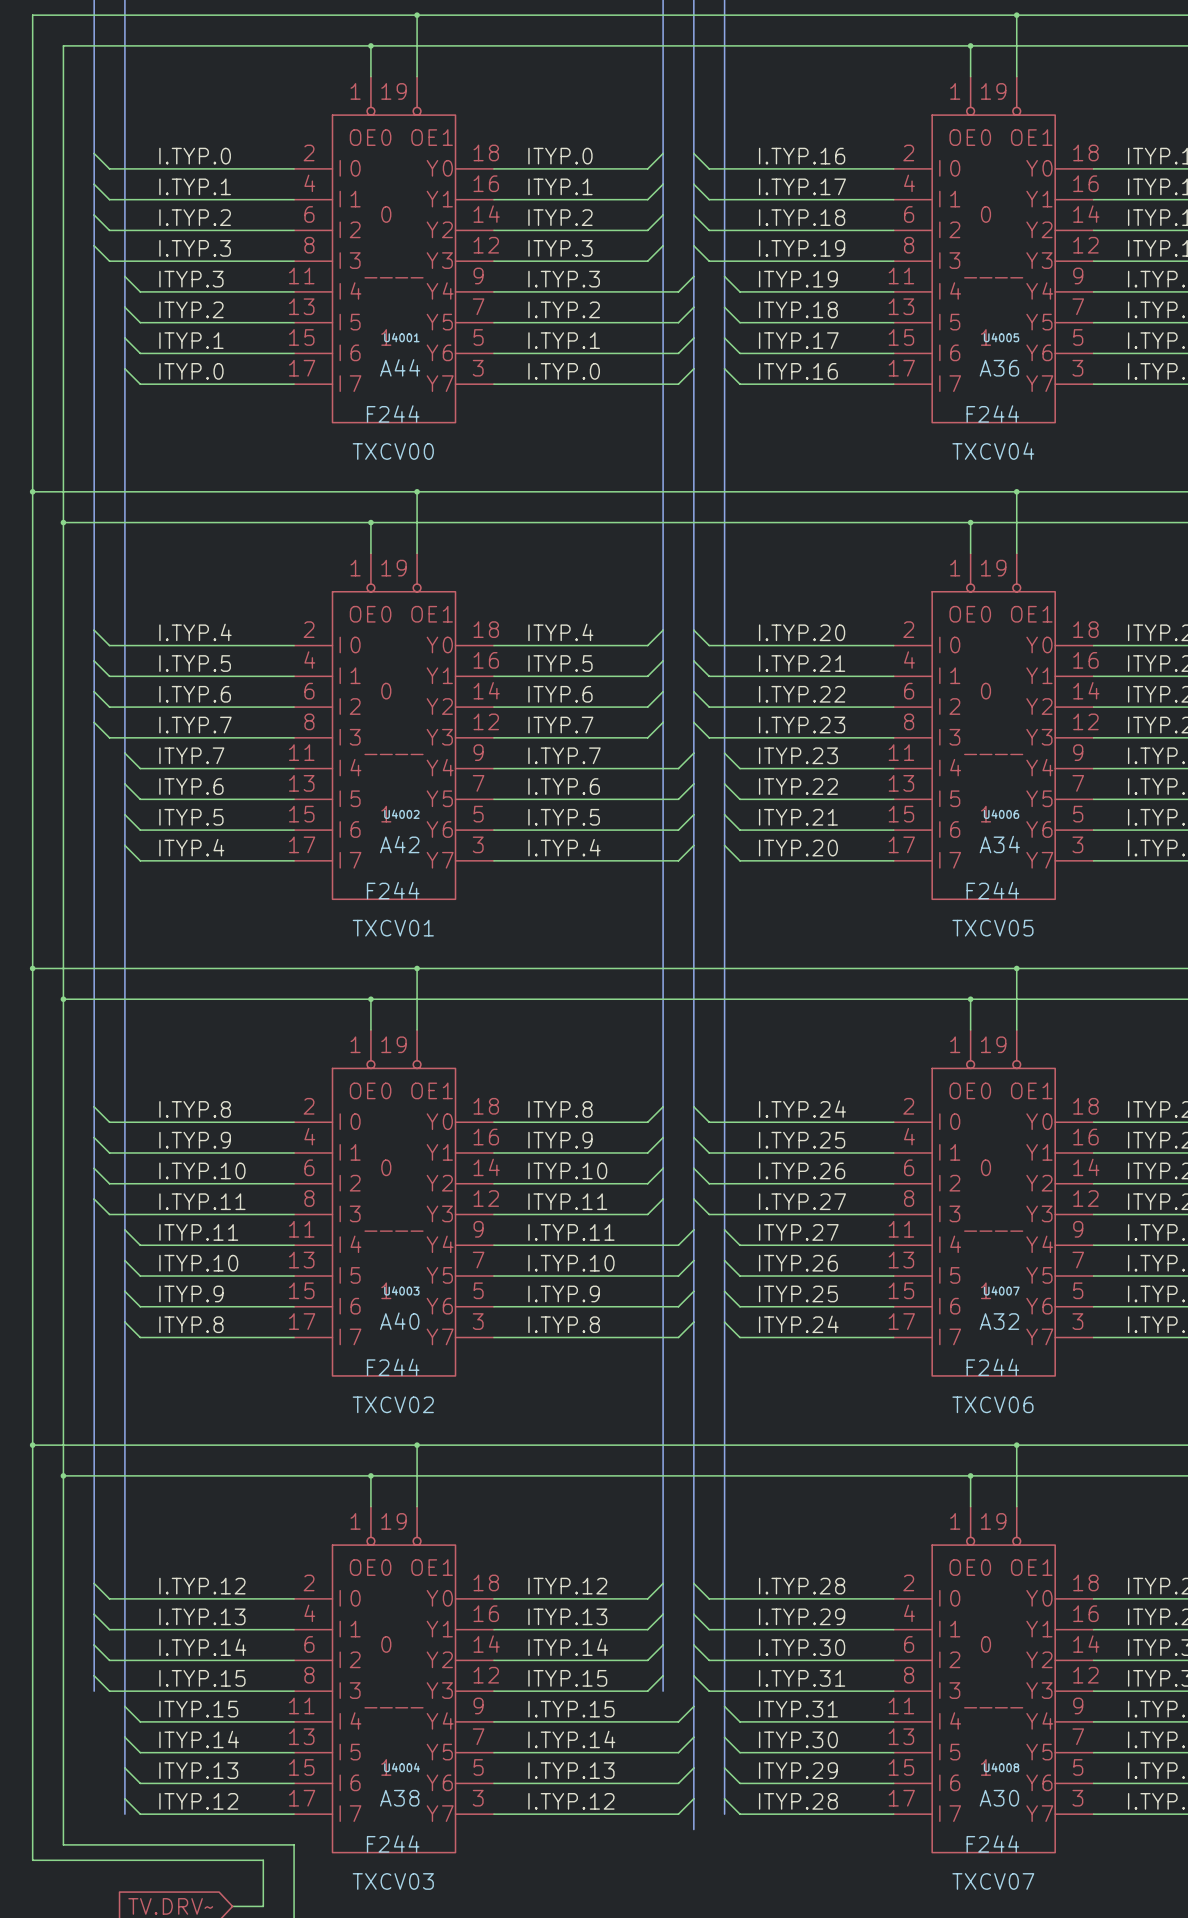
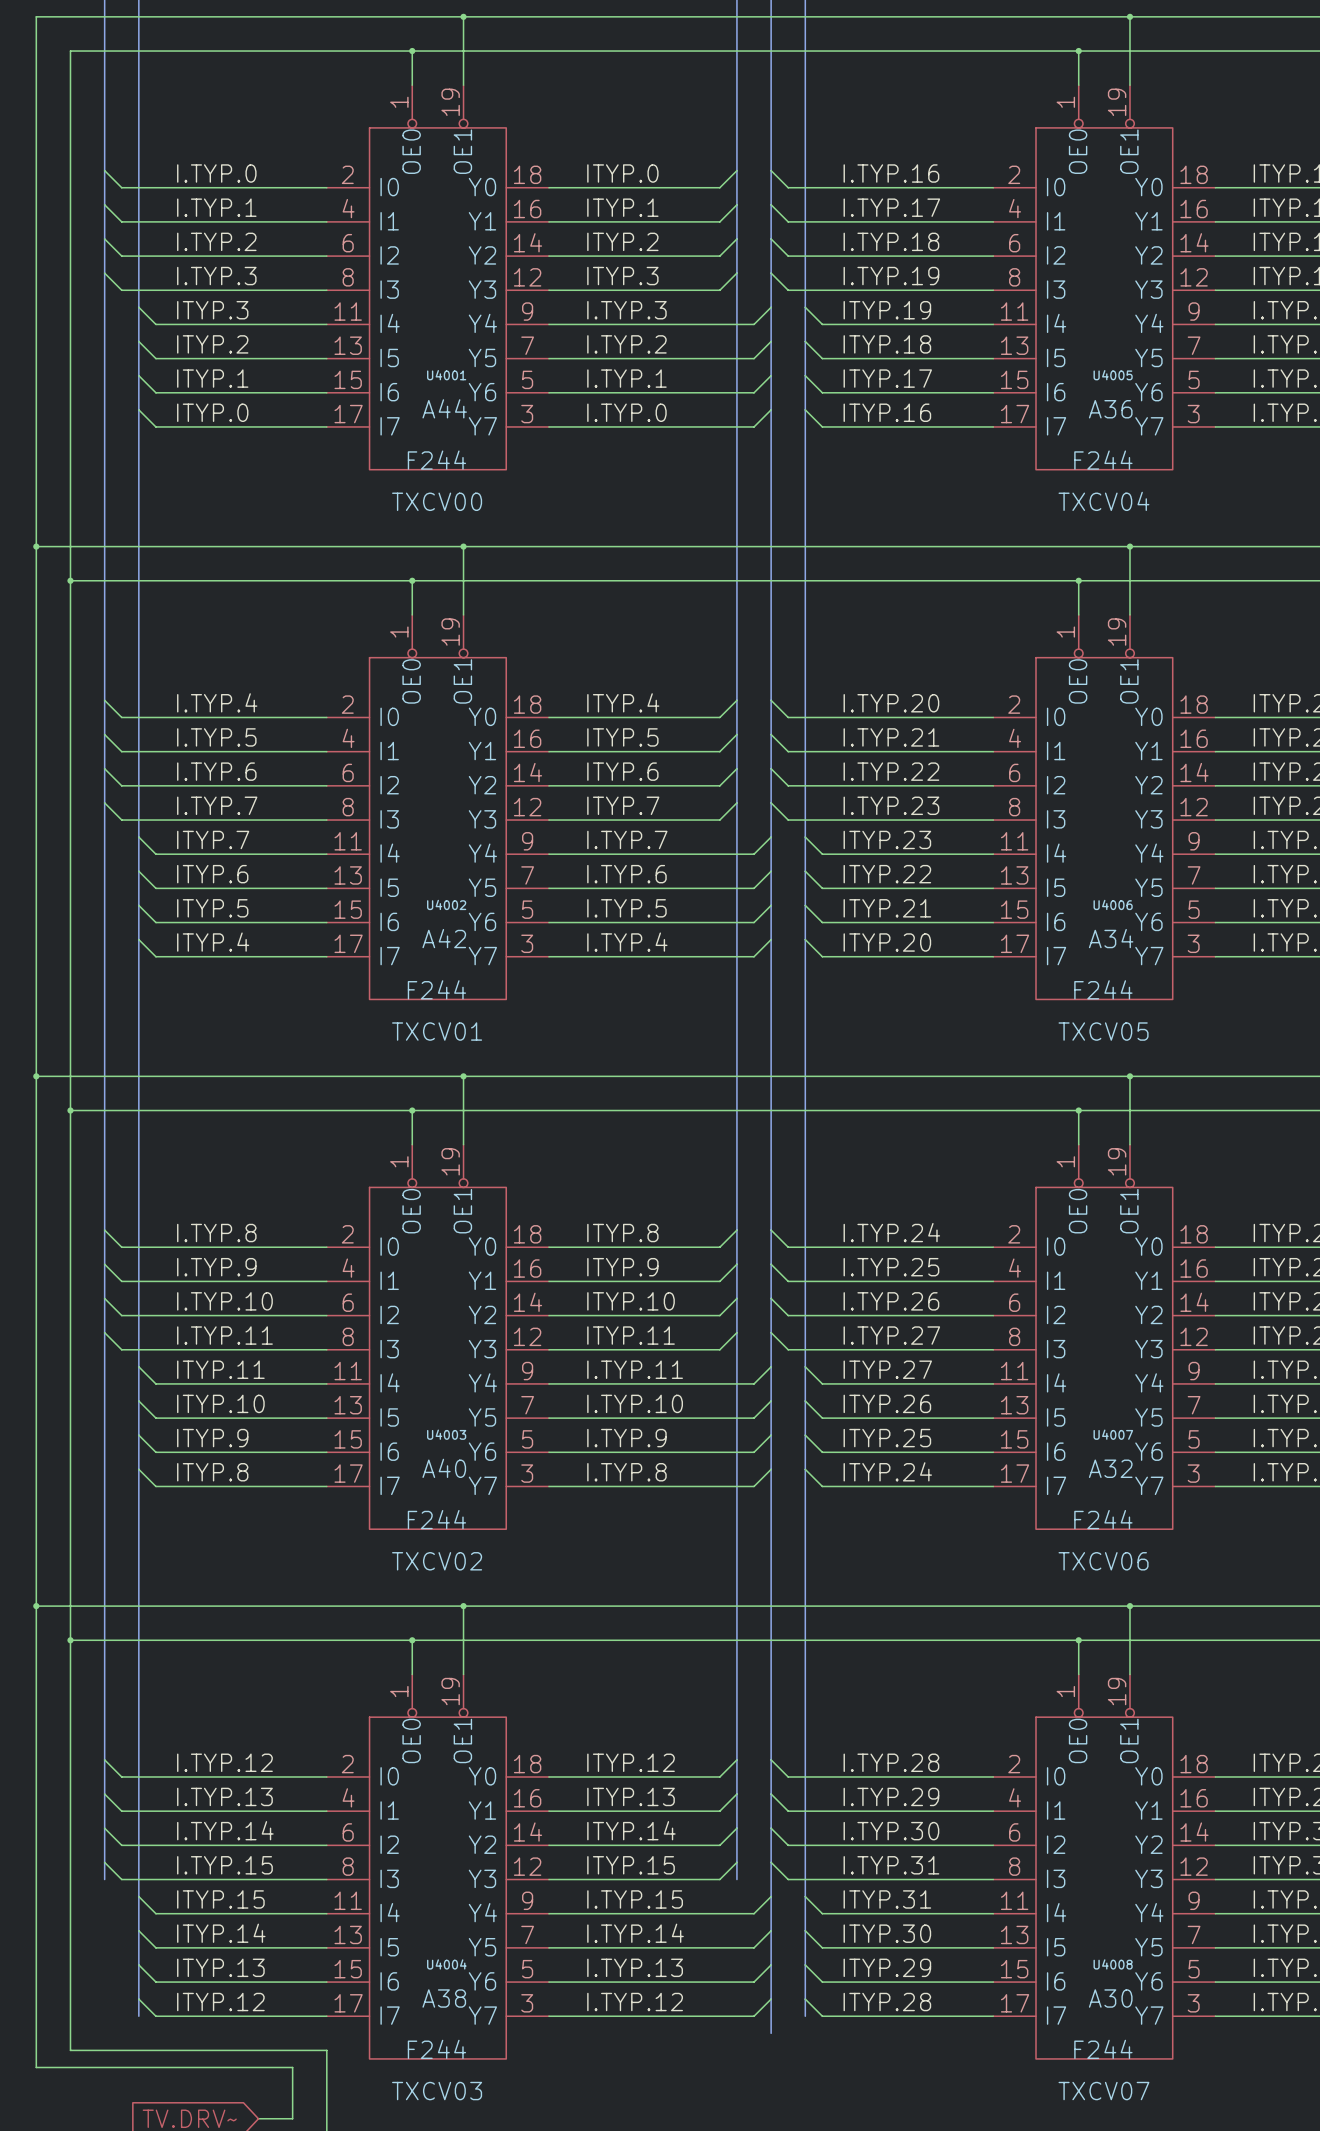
U4001 symbol: [294, 76, 494, 423] -> [326, 85, 549, 470]
U4005 symbol: [893, 76, 1094, 423] -> [993, 85, 1216, 470]
U4002 symbol: [294, 553, 494, 900] -> [326, 614, 549, 1000]
U4006 symbol: [893, 553, 1094, 900] -> [993, 614, 1216, 1000]
U4003 symbol: [294, 1029, 494, 1376] -> [326, 1144, 549, 1530]
U4007 symbol: [893, 1029, 1094, 1376] -> [993, 1144, 1216, 1530]
U4004 symbol: [294, 1506, 494, 1853] -> [326, 1674, 549, 2059]
U4008 symbol: [893, 1506, 1094, 1853] -> [993, 1674, 1216, 2059]

